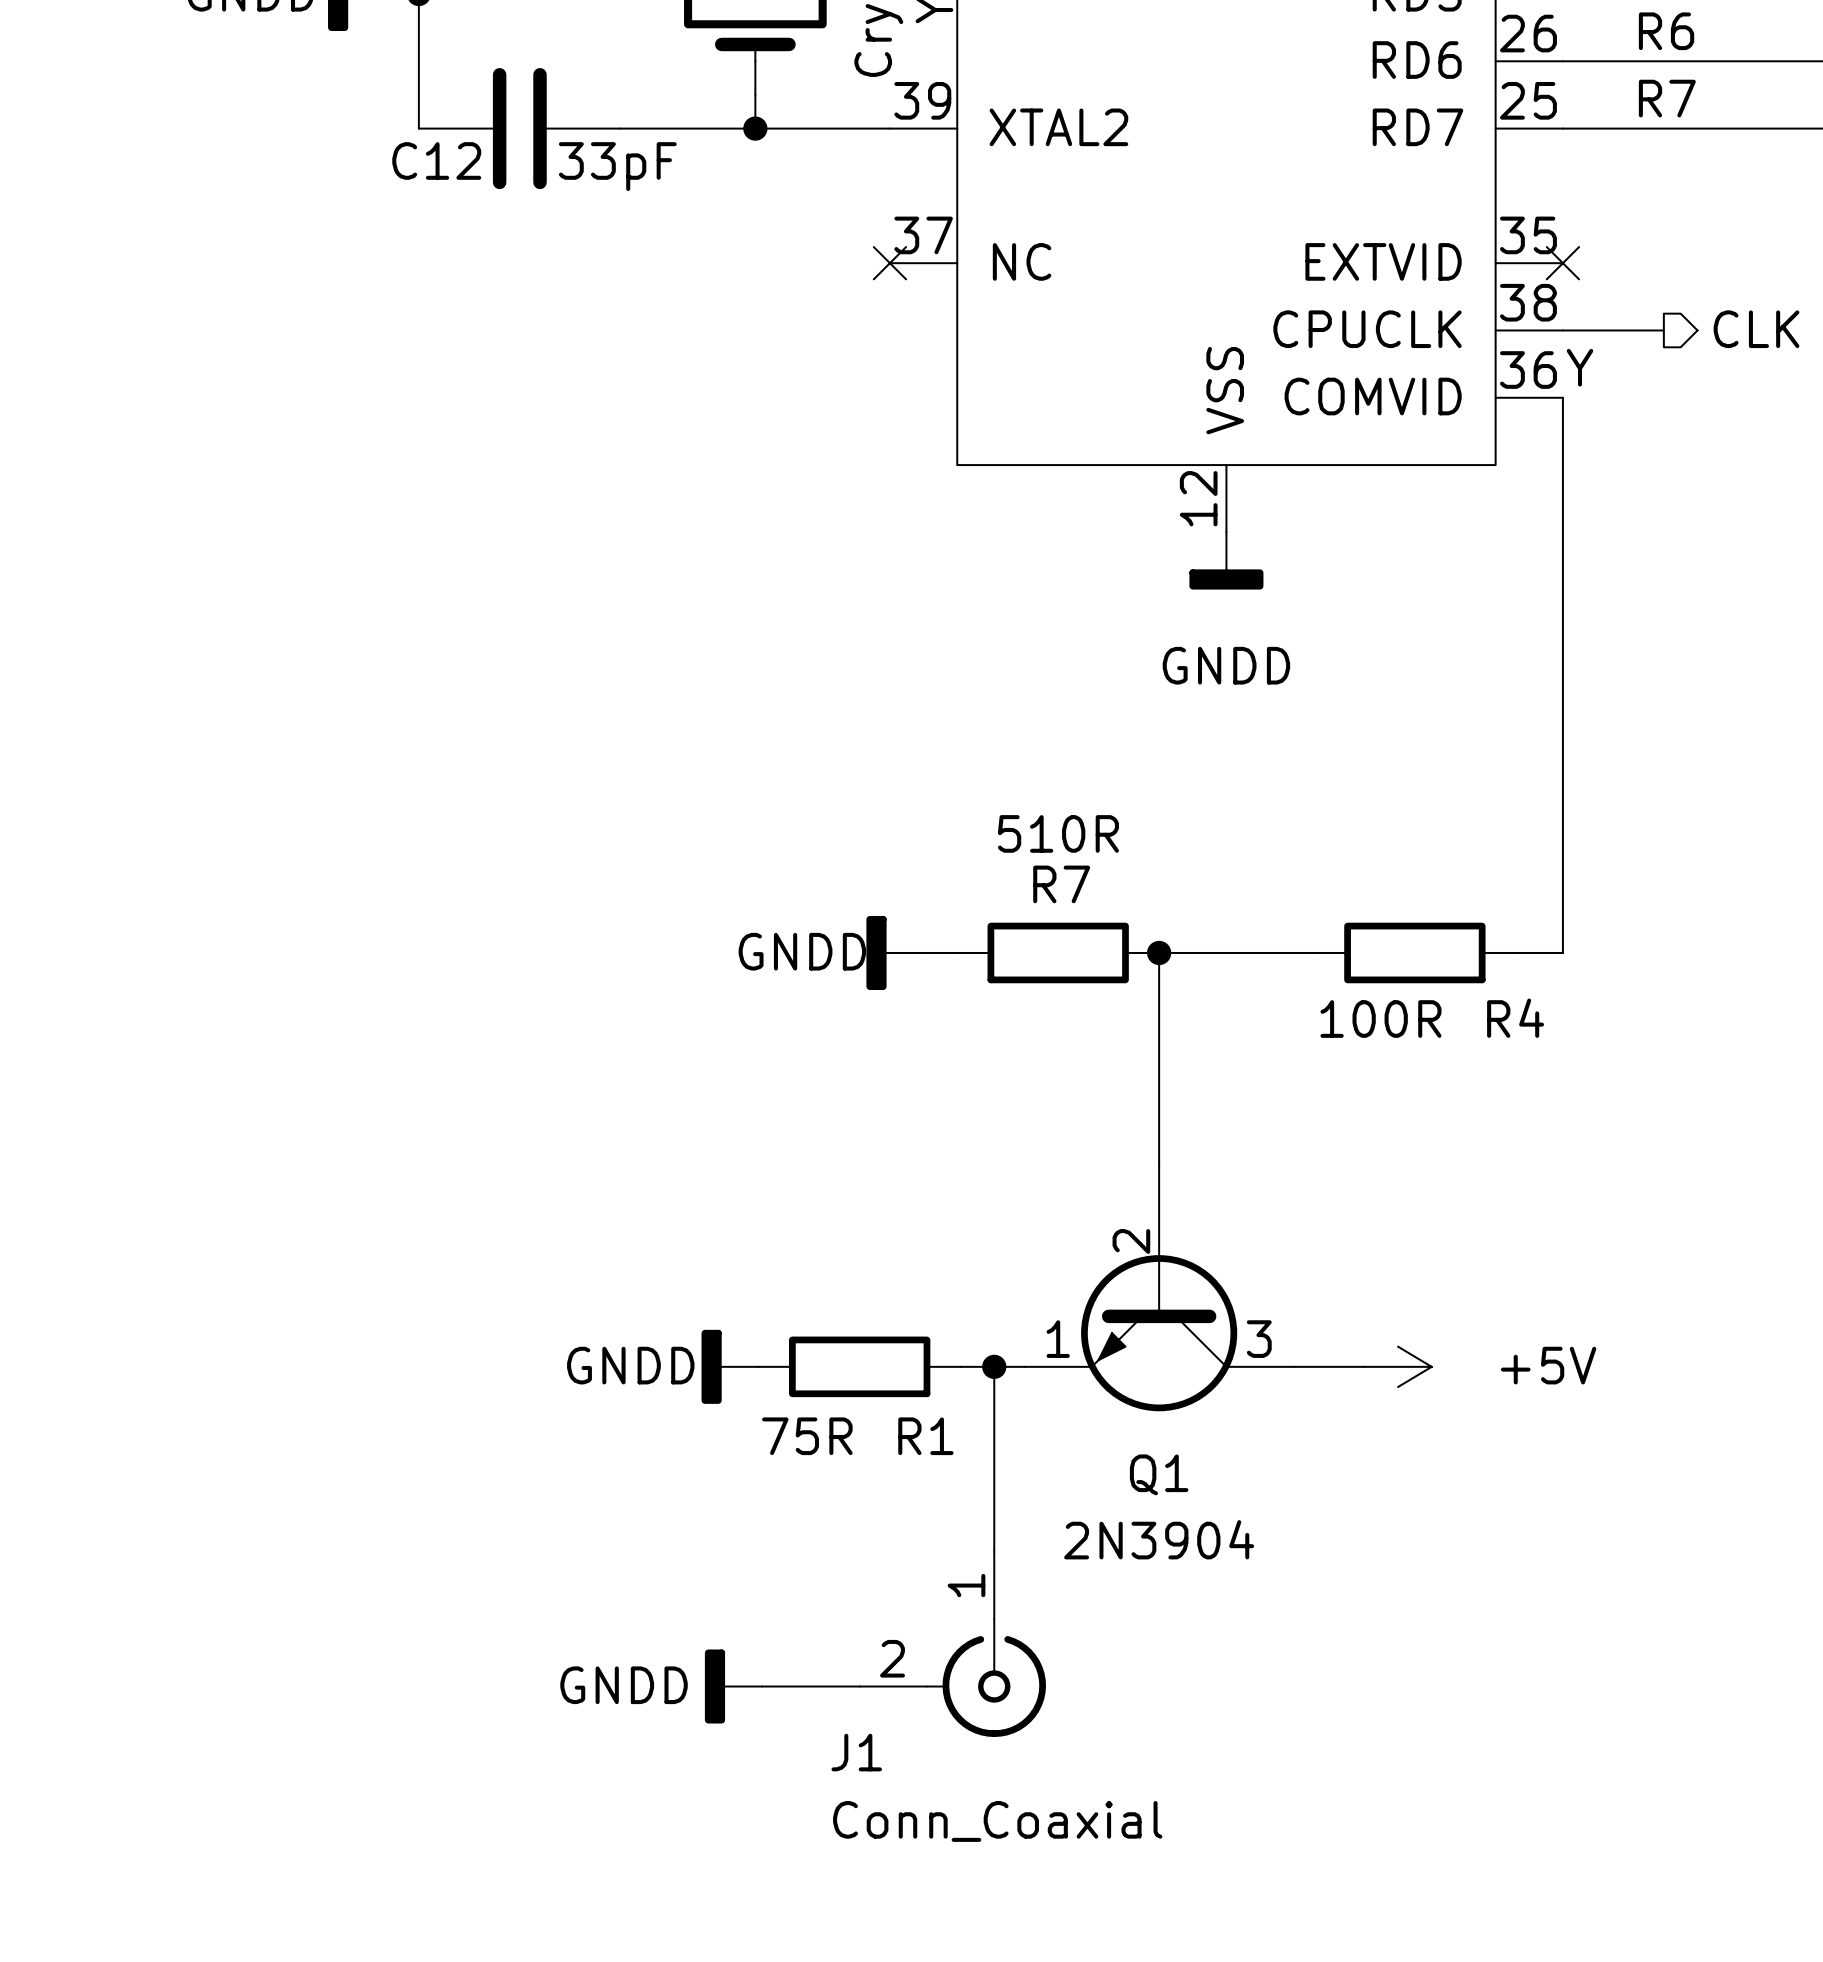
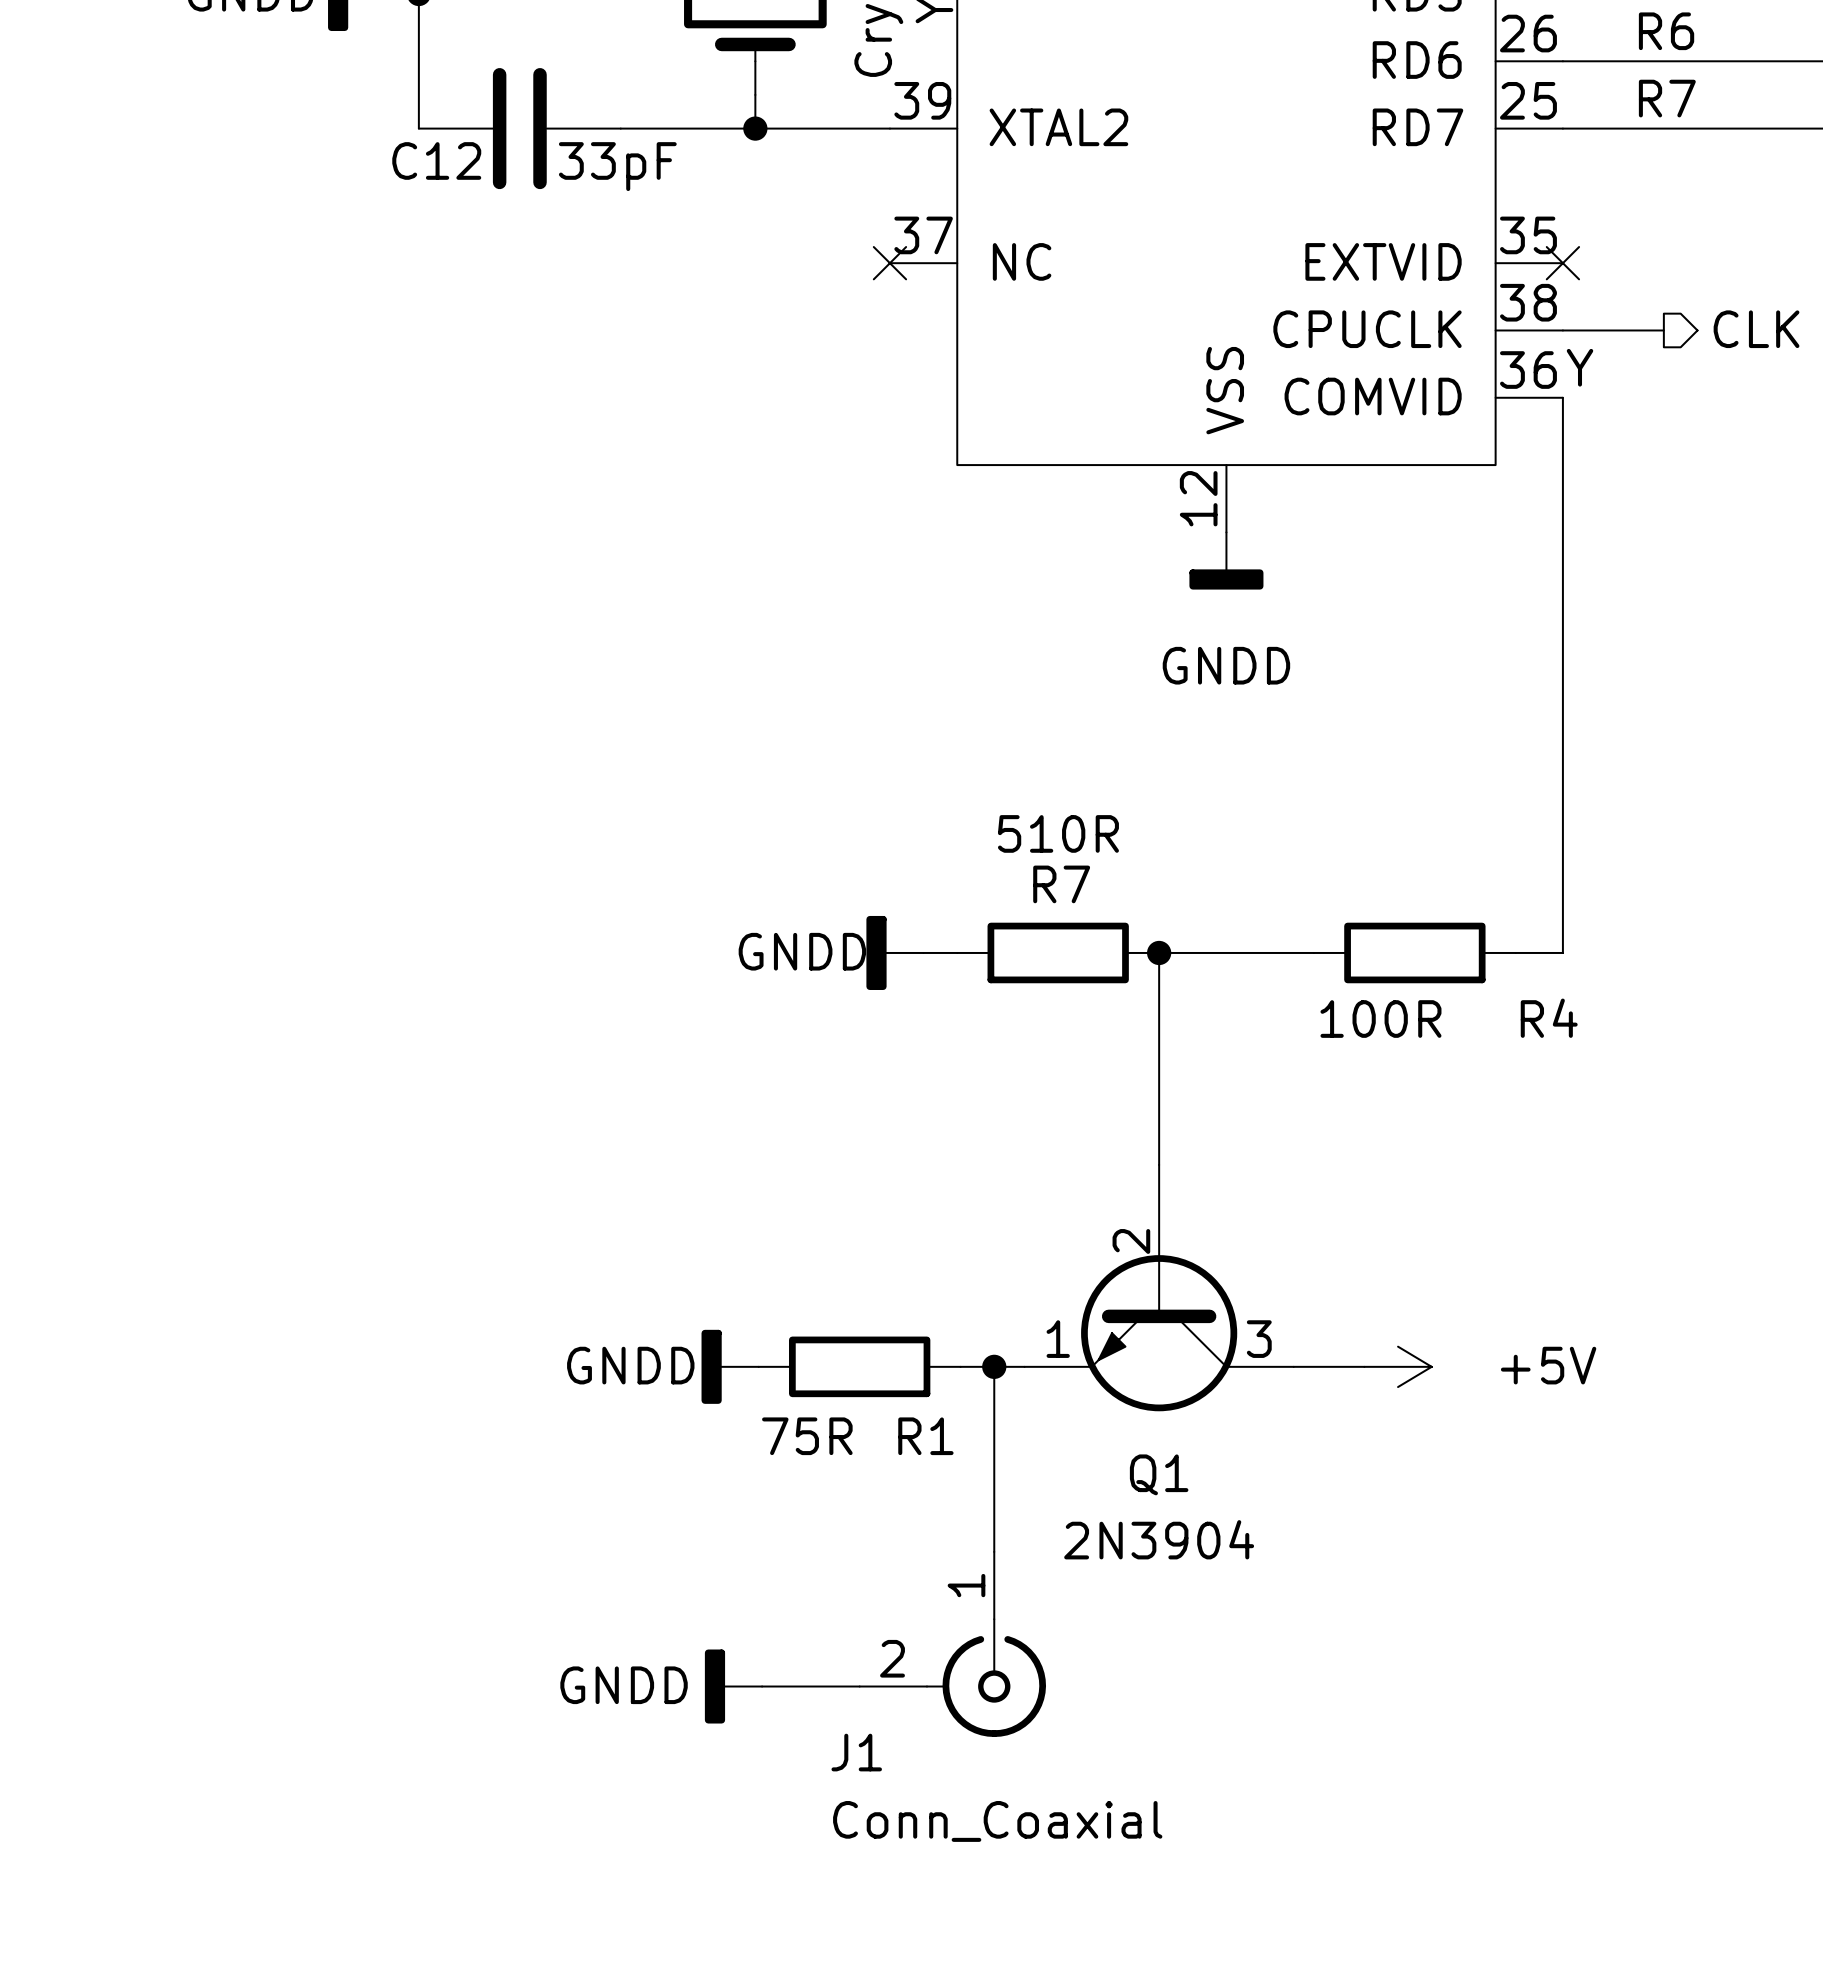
R4 name position: R4 (1515, 1018) -> R4 (1549, 1018)

